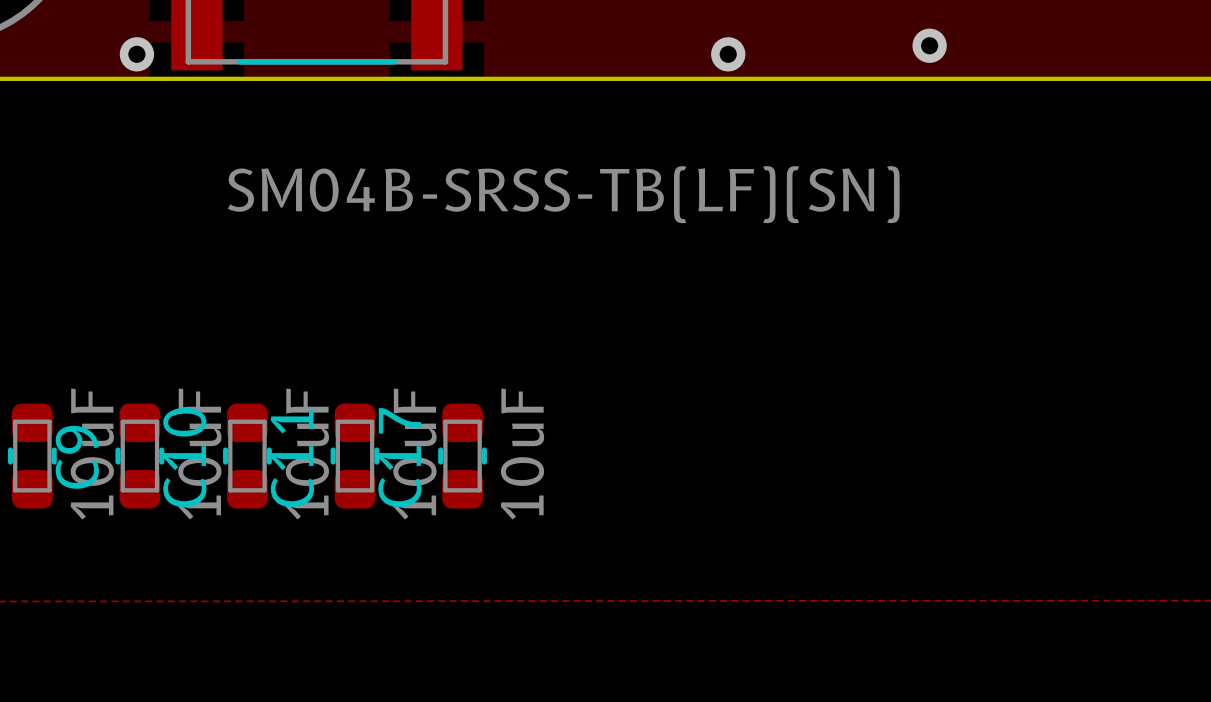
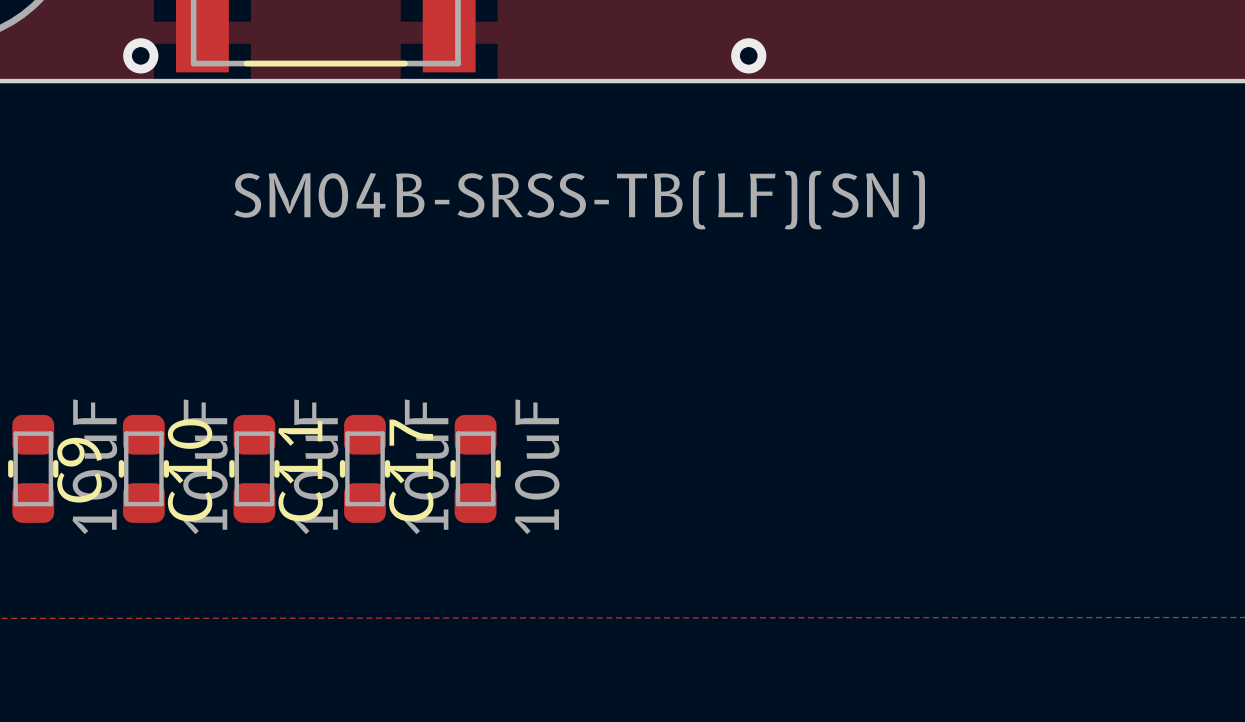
via: (929, 45) -> none

